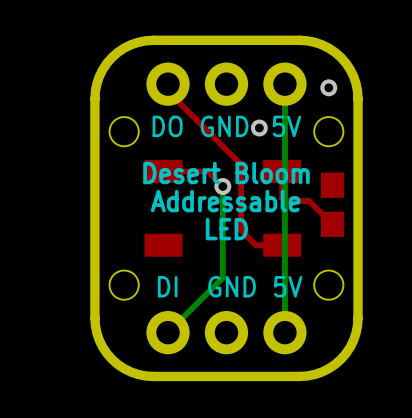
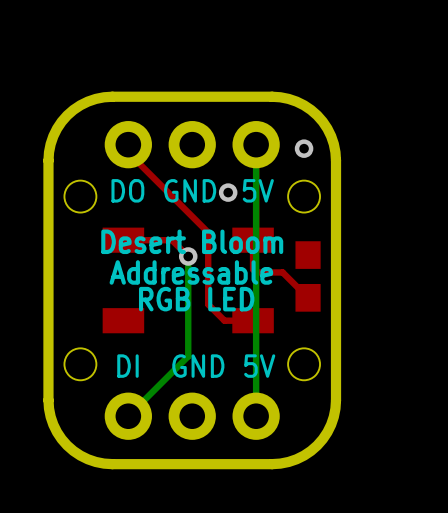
text: LED (226, 229) -> RGB LED (196, 299)

